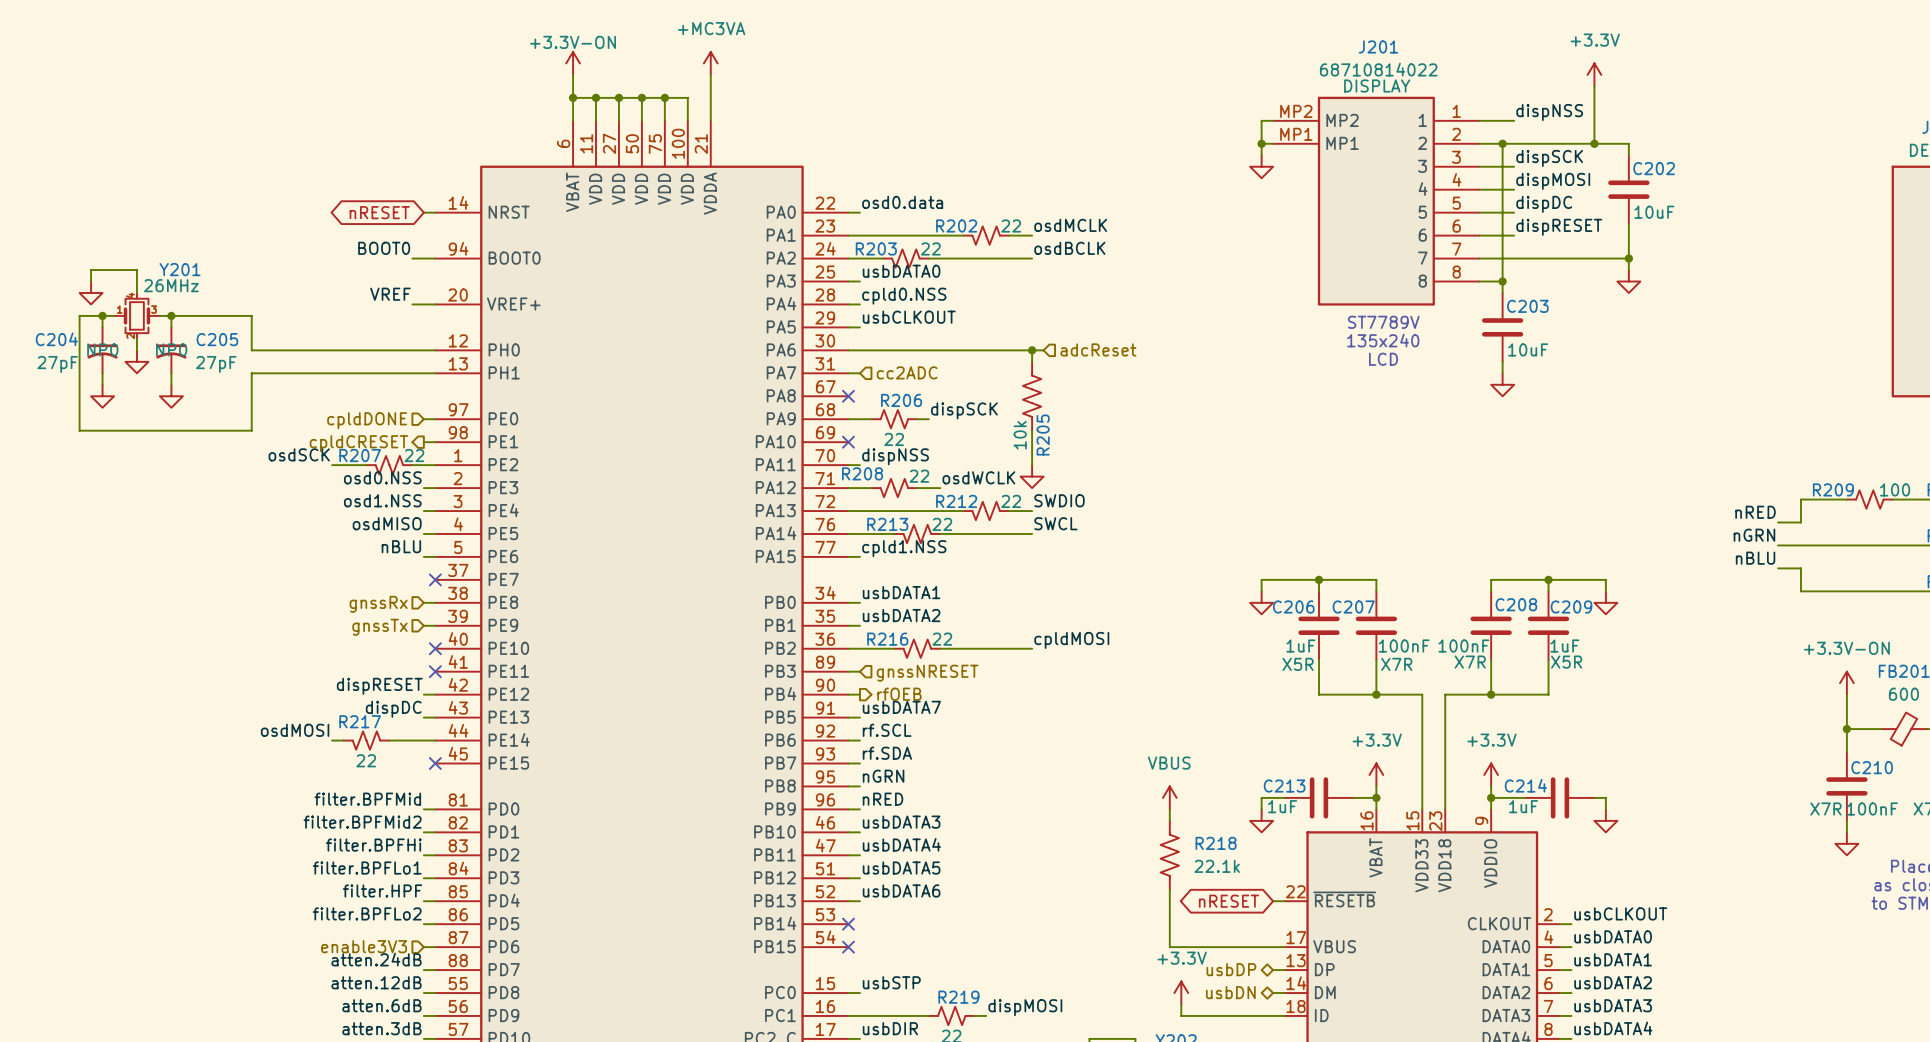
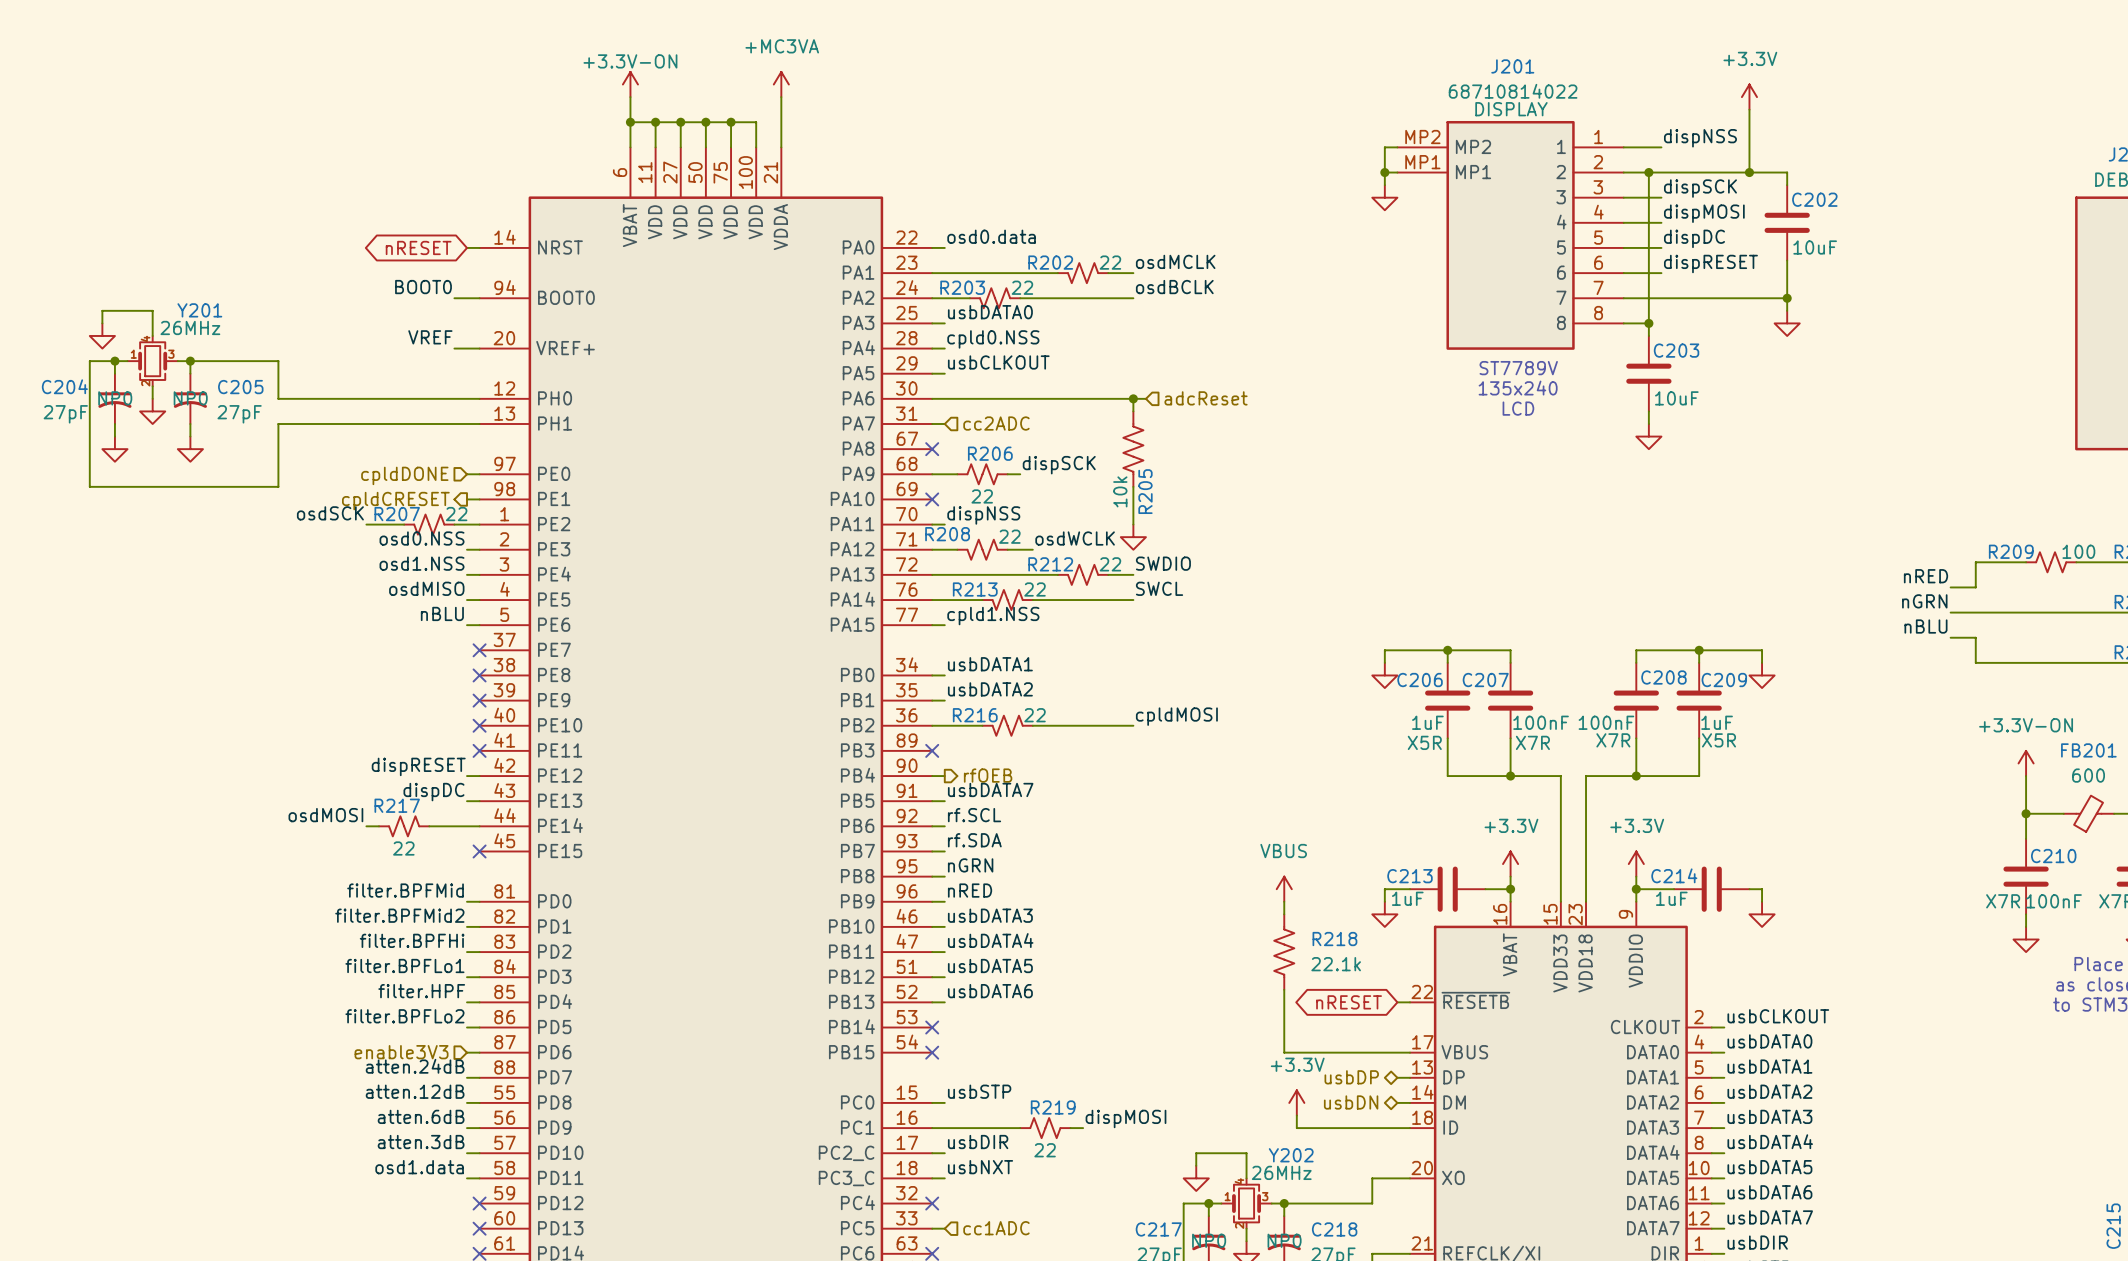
wire: (423, 602) (435, 602) -> none
no-connect mark: none -> (479, 675)
hierarchical label: gnssRx (378, 604) -> none
wire: (423, 625) (435, 625) -> none
no-connect mark: none -> (479, 700)
hierarchical label: gnssTx (379, 627) -> none
wire: (848, 671) (859, 671) -> none
no-connect mark: none -> (932, 750)
hierarchical label: gnssNRESET (927, 673) -> none

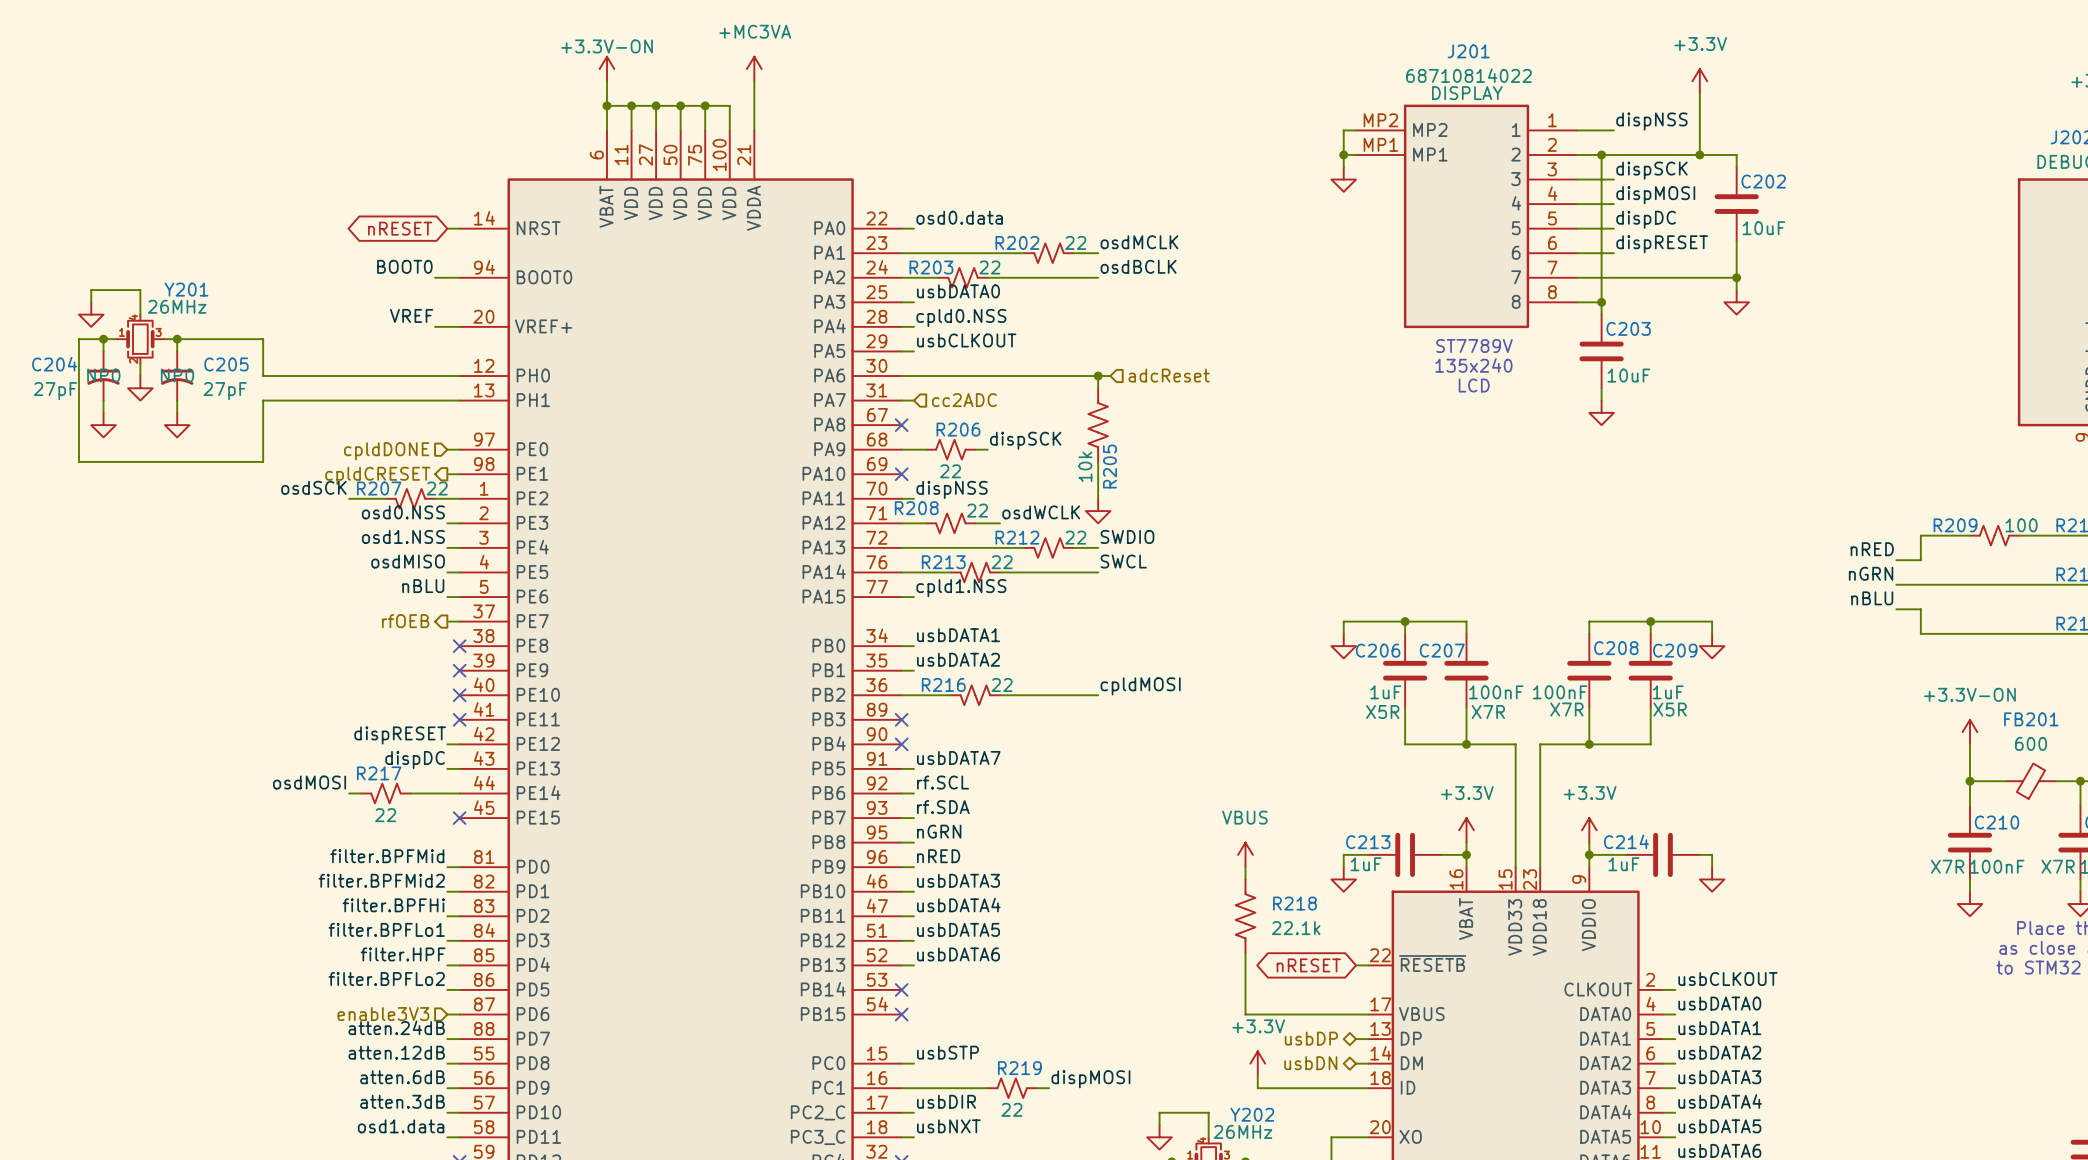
hierarchical label: none -> rfOEB (405, 621)
wire: none -> (447, 621) (459, 621)
no-connect mark: (479, 650) -> none
hierarchical label: rfOEB (988, 775) -> none
wire: (932, 776) (944, 776) -> none
no-connect mark: none -> (901, 744)

